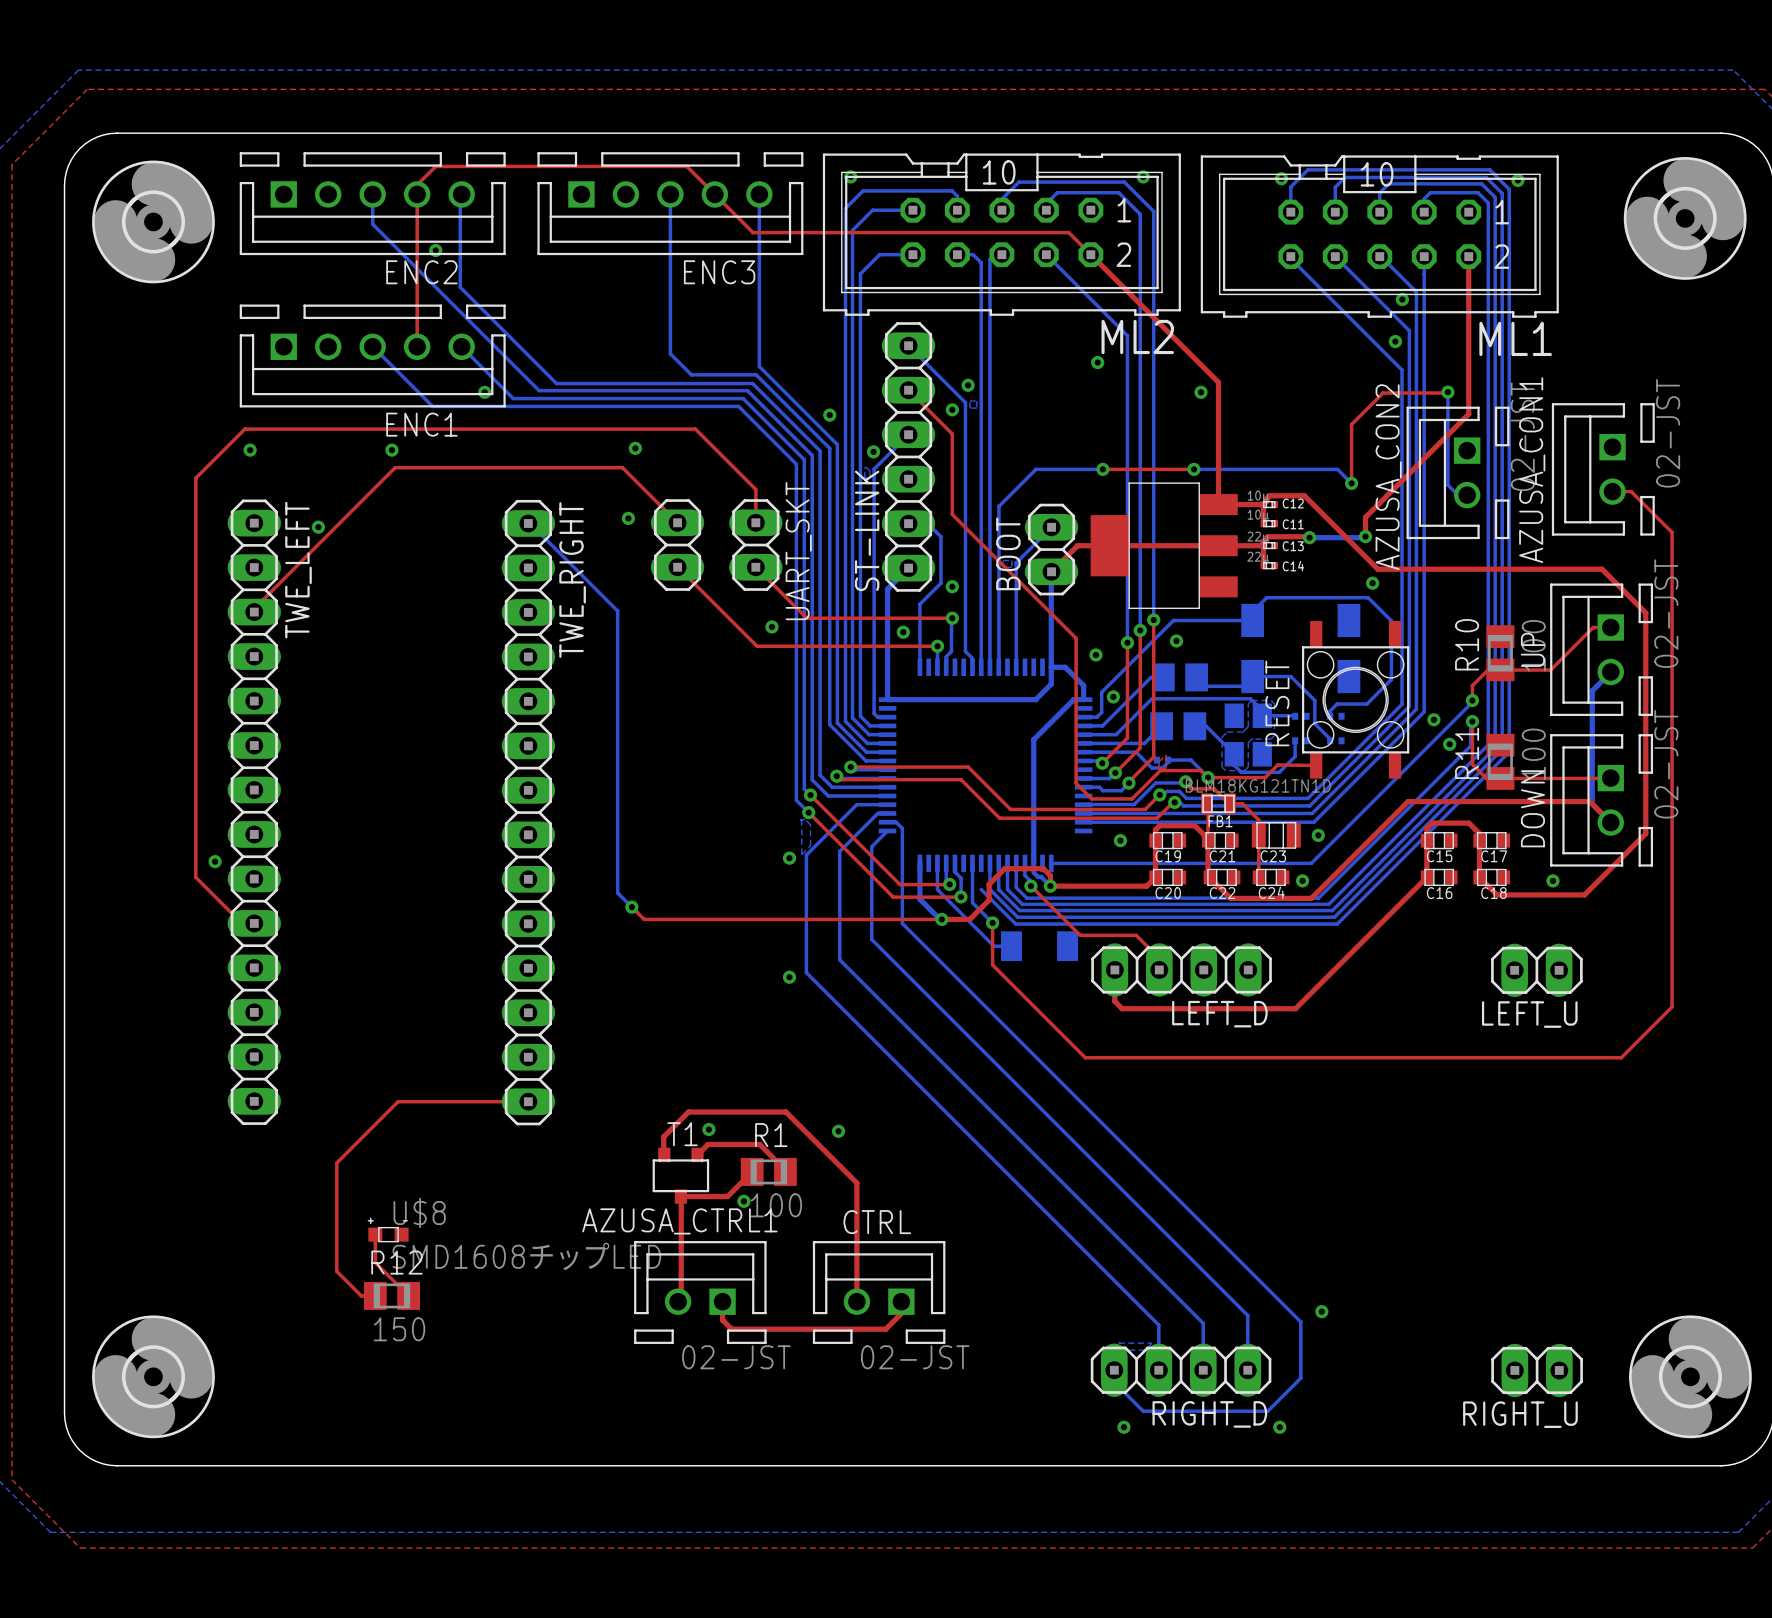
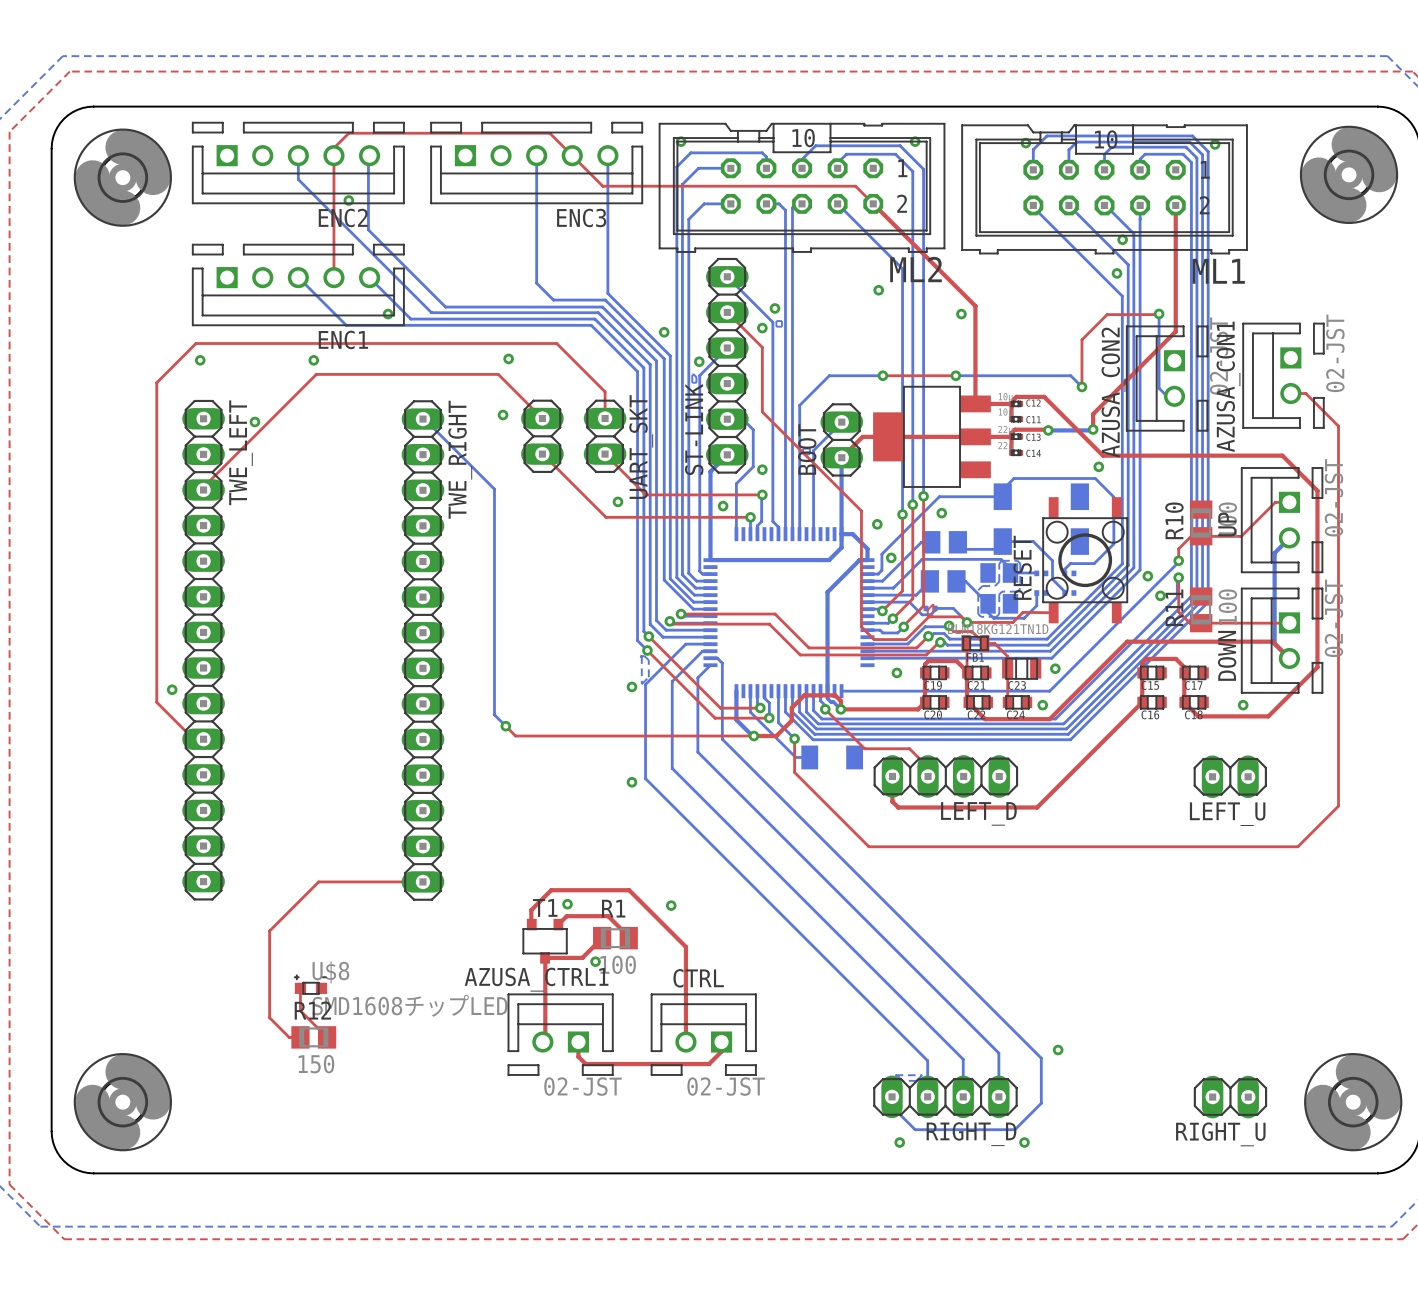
bottom track: none -> (785, 691) (785, 712)

